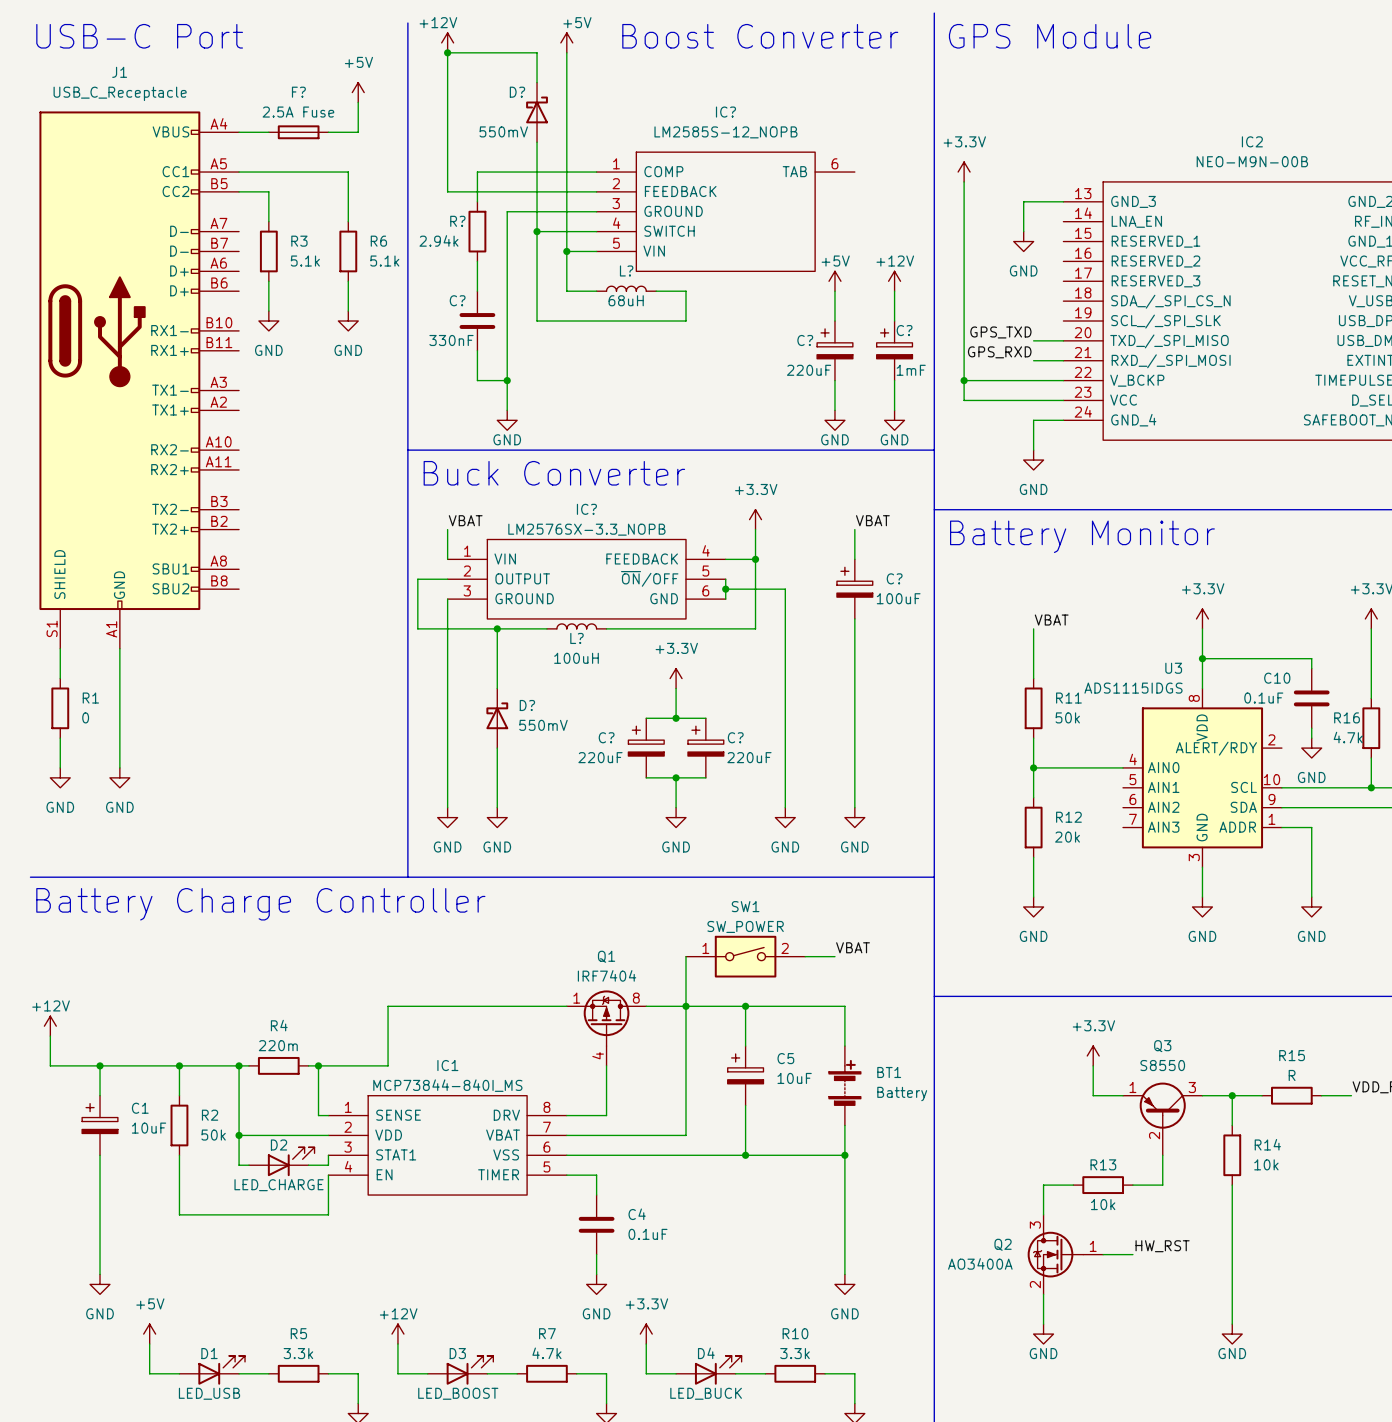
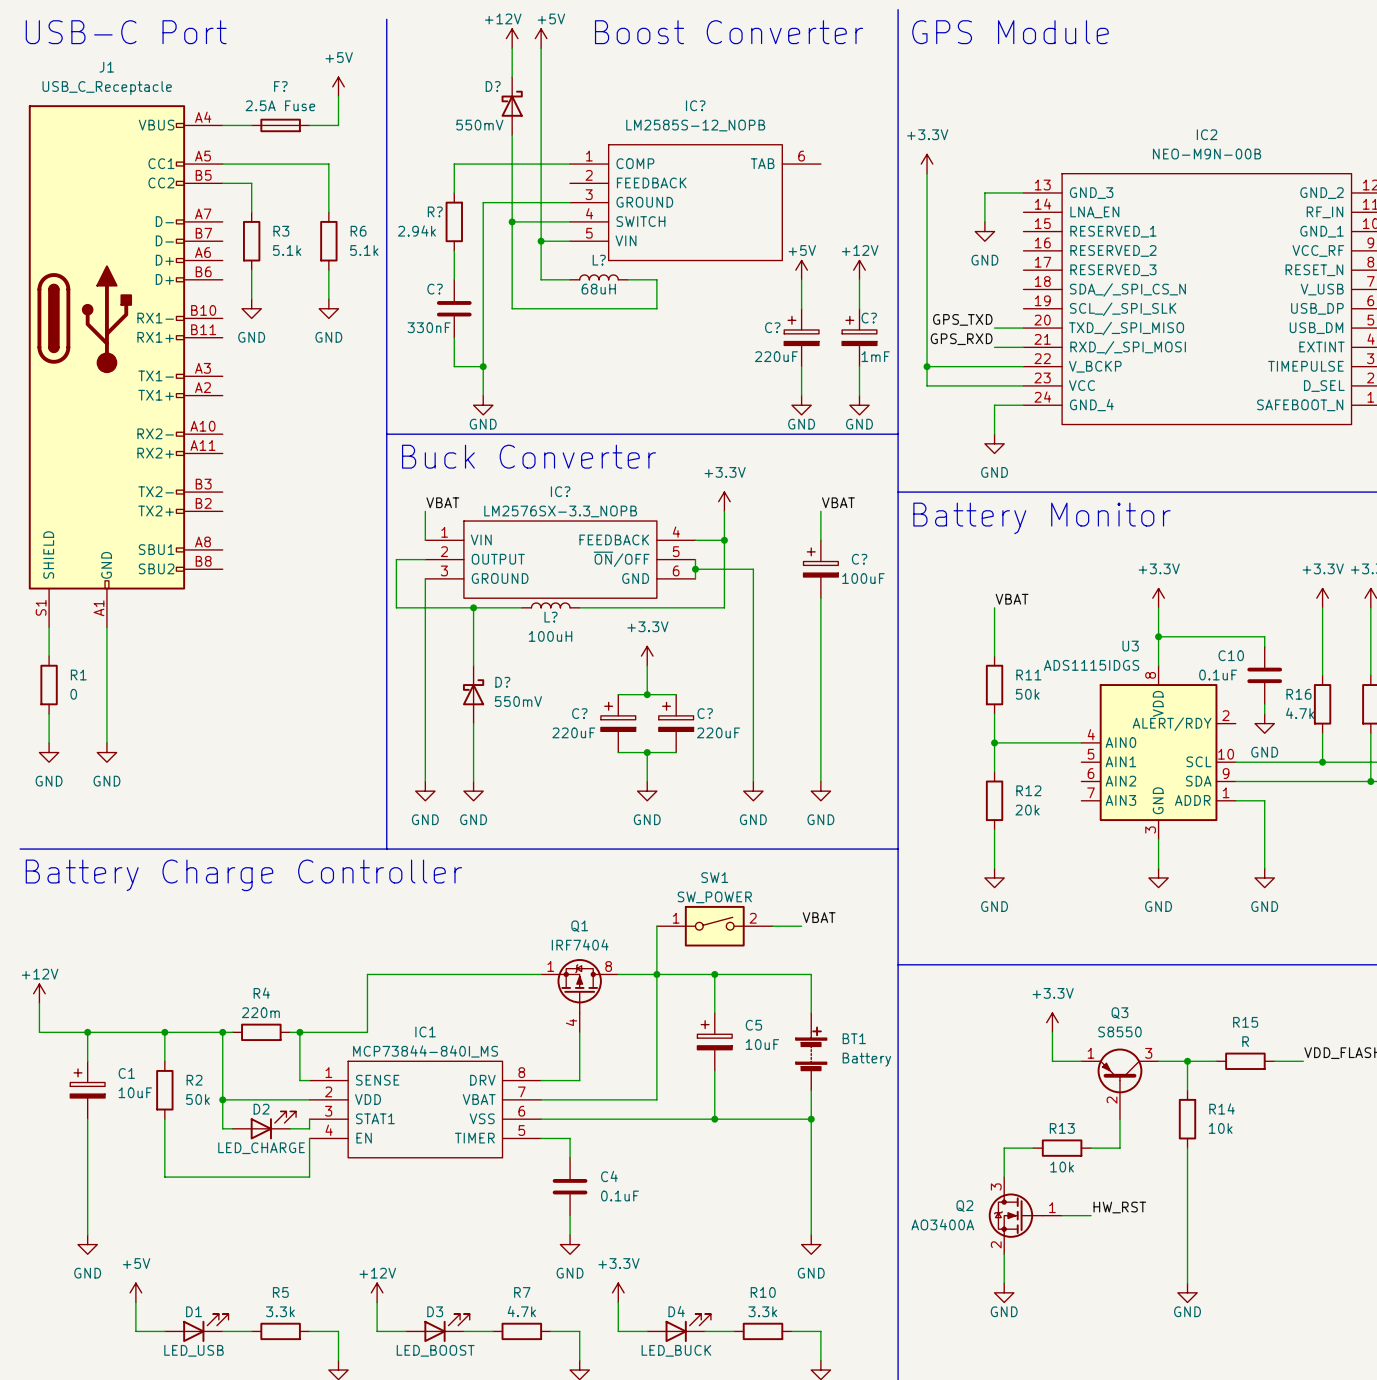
power symbol position: +12V (447, 42) -> +12V (512, 38)
junction: (447, 52) -> none
wire: (537, 52) (447, 52) (447, 191) (596, 191) -> none

